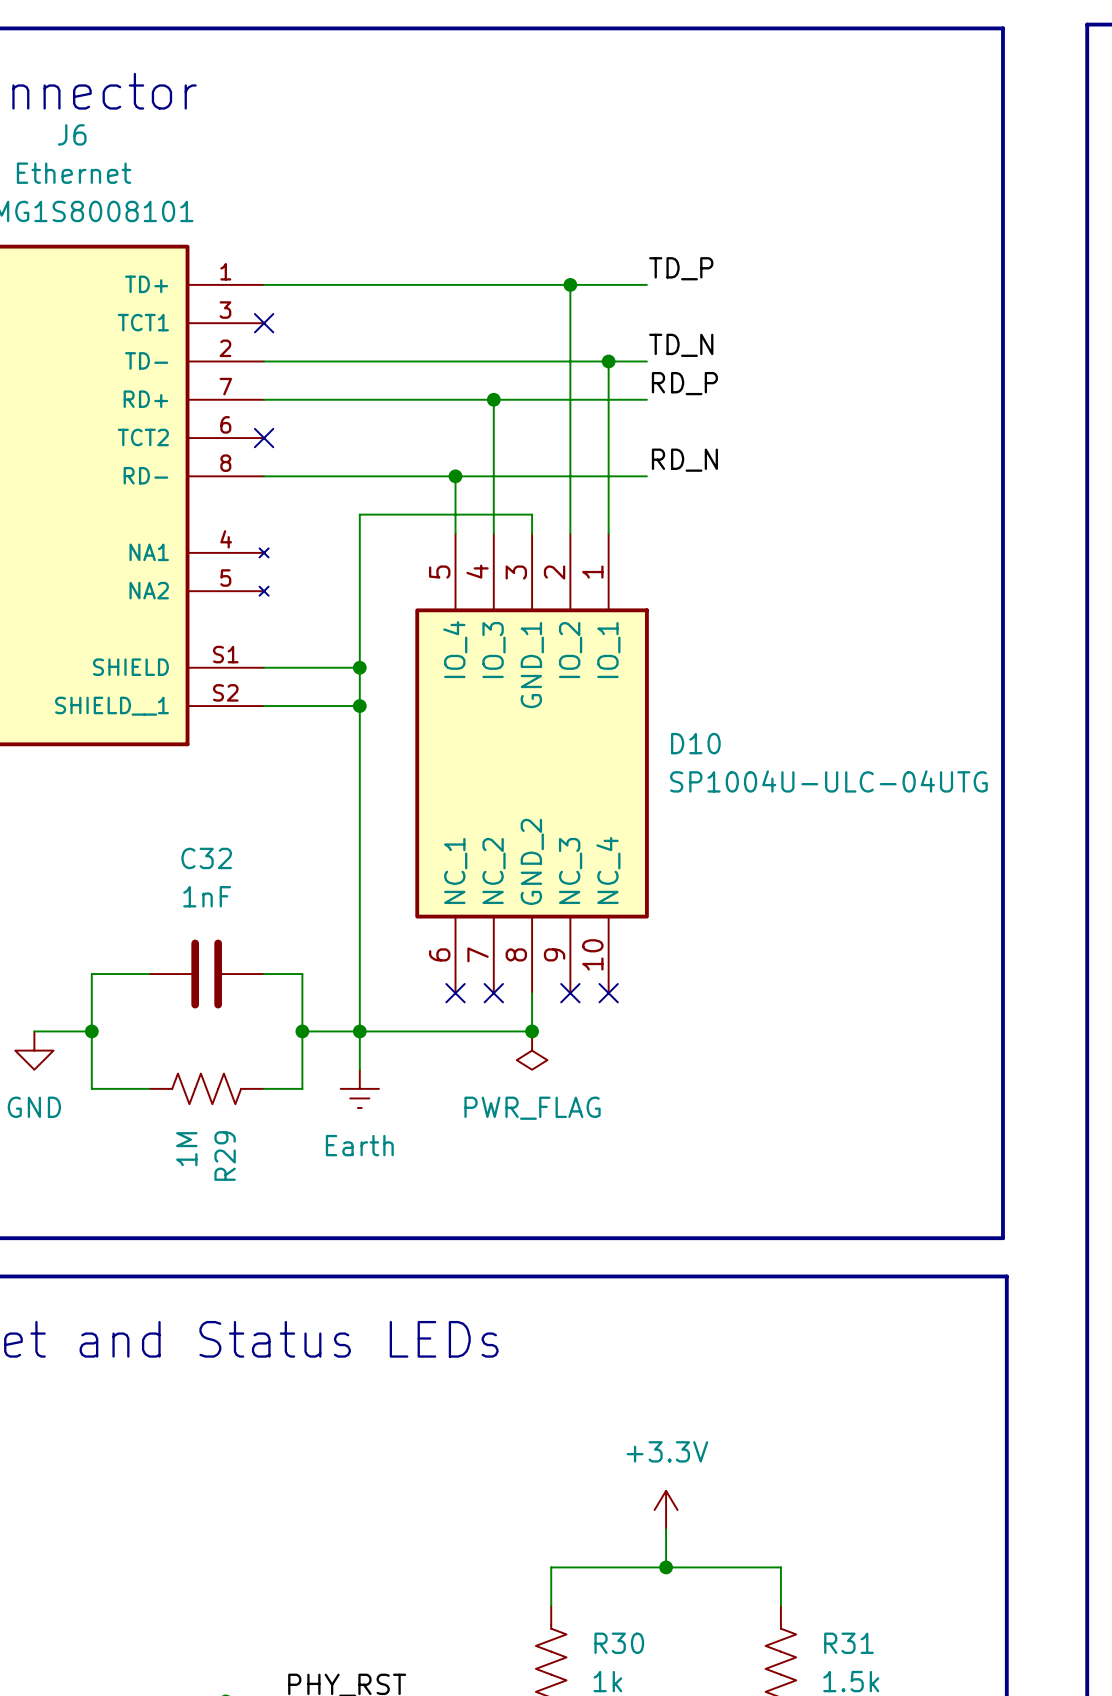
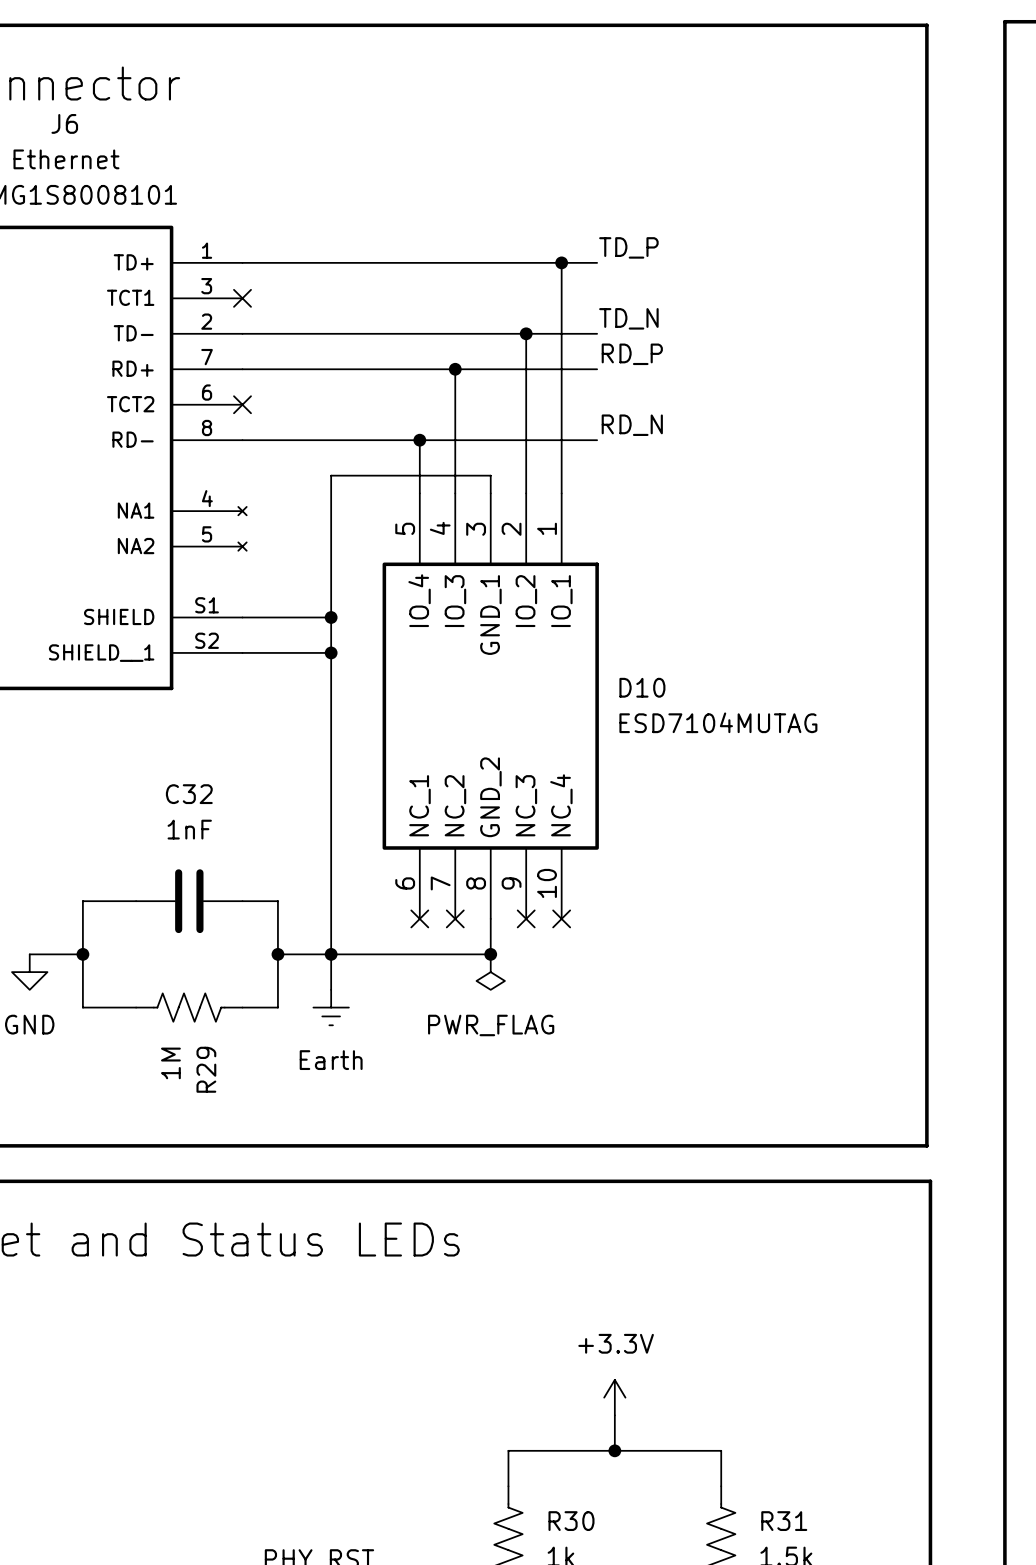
wire: (570, 284) (570, 361) -> (561, 262) (561, 333)
junction: (570, 284) -> none
junction: none -> (561, 262)
junction: none -> (526, 333)
junction: (608, 361) -> none
D10 value: SP1004U-ULC-04UTG (828, 781) -> ESD7104MUTAG (718, 722)

